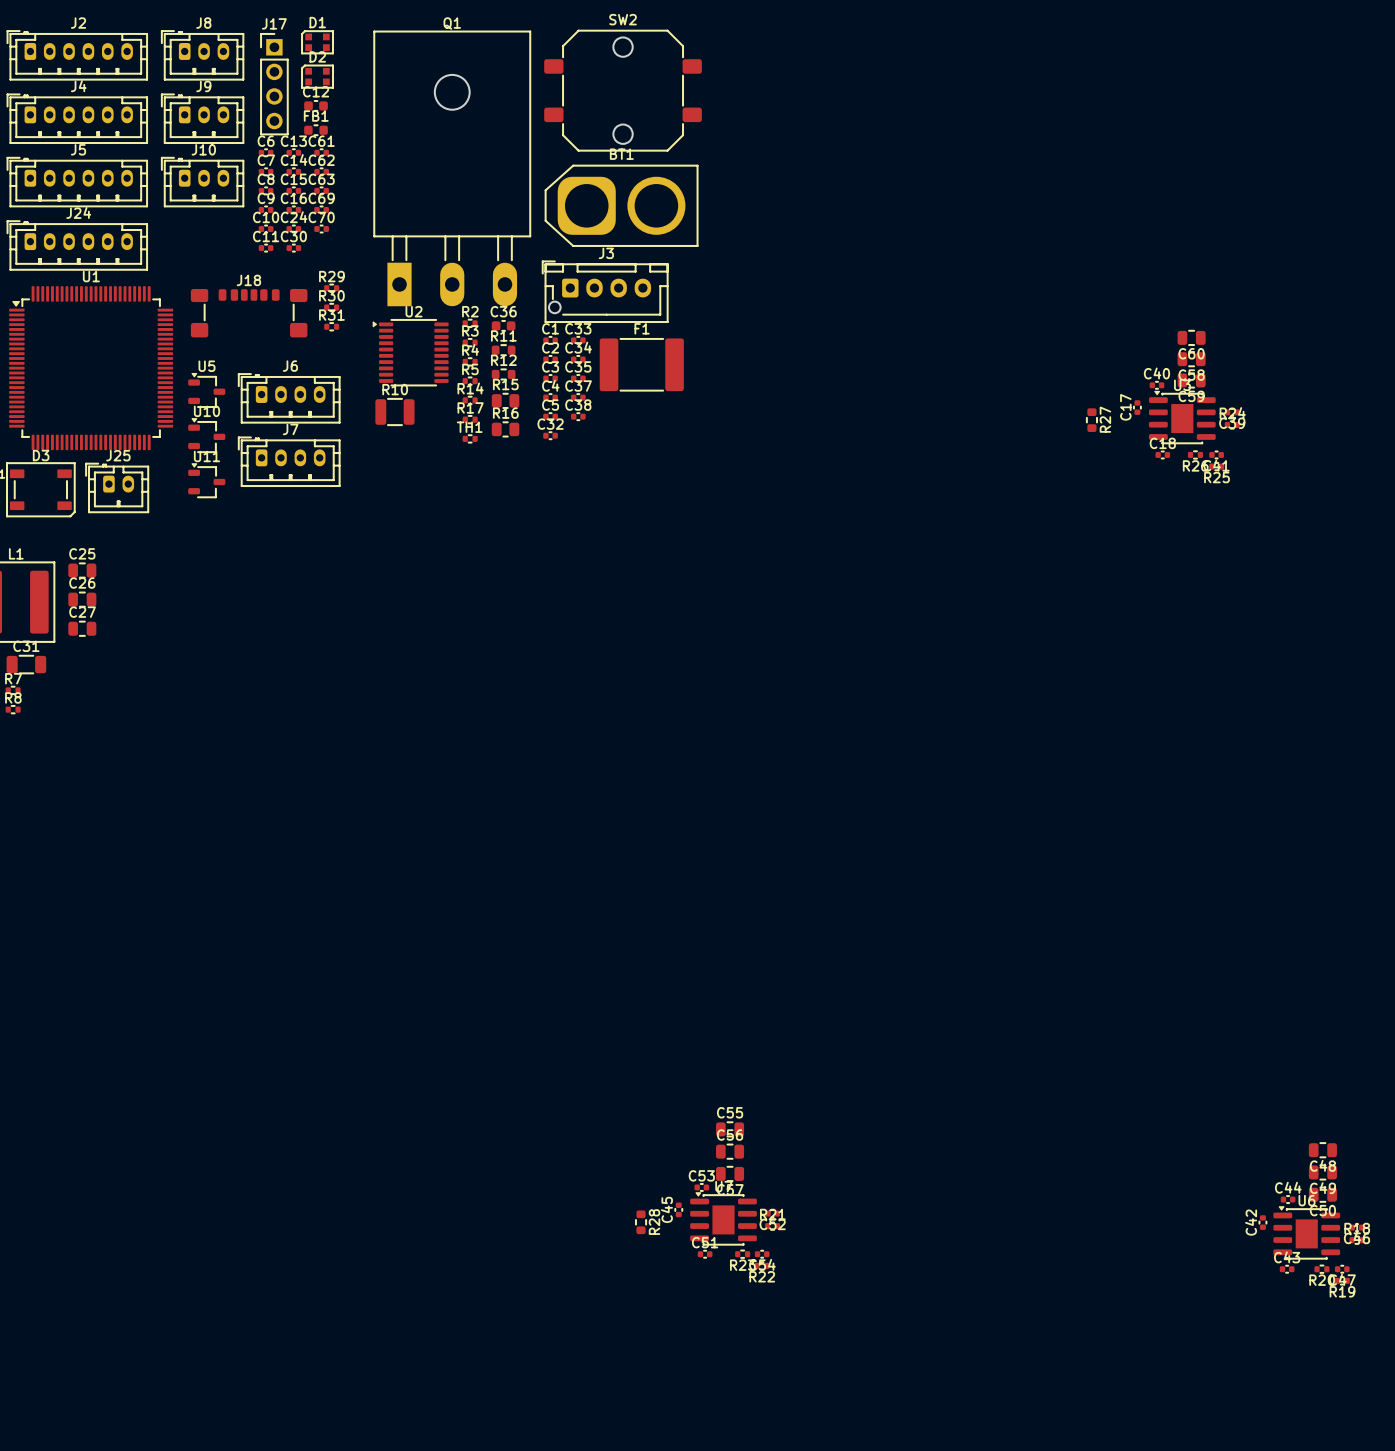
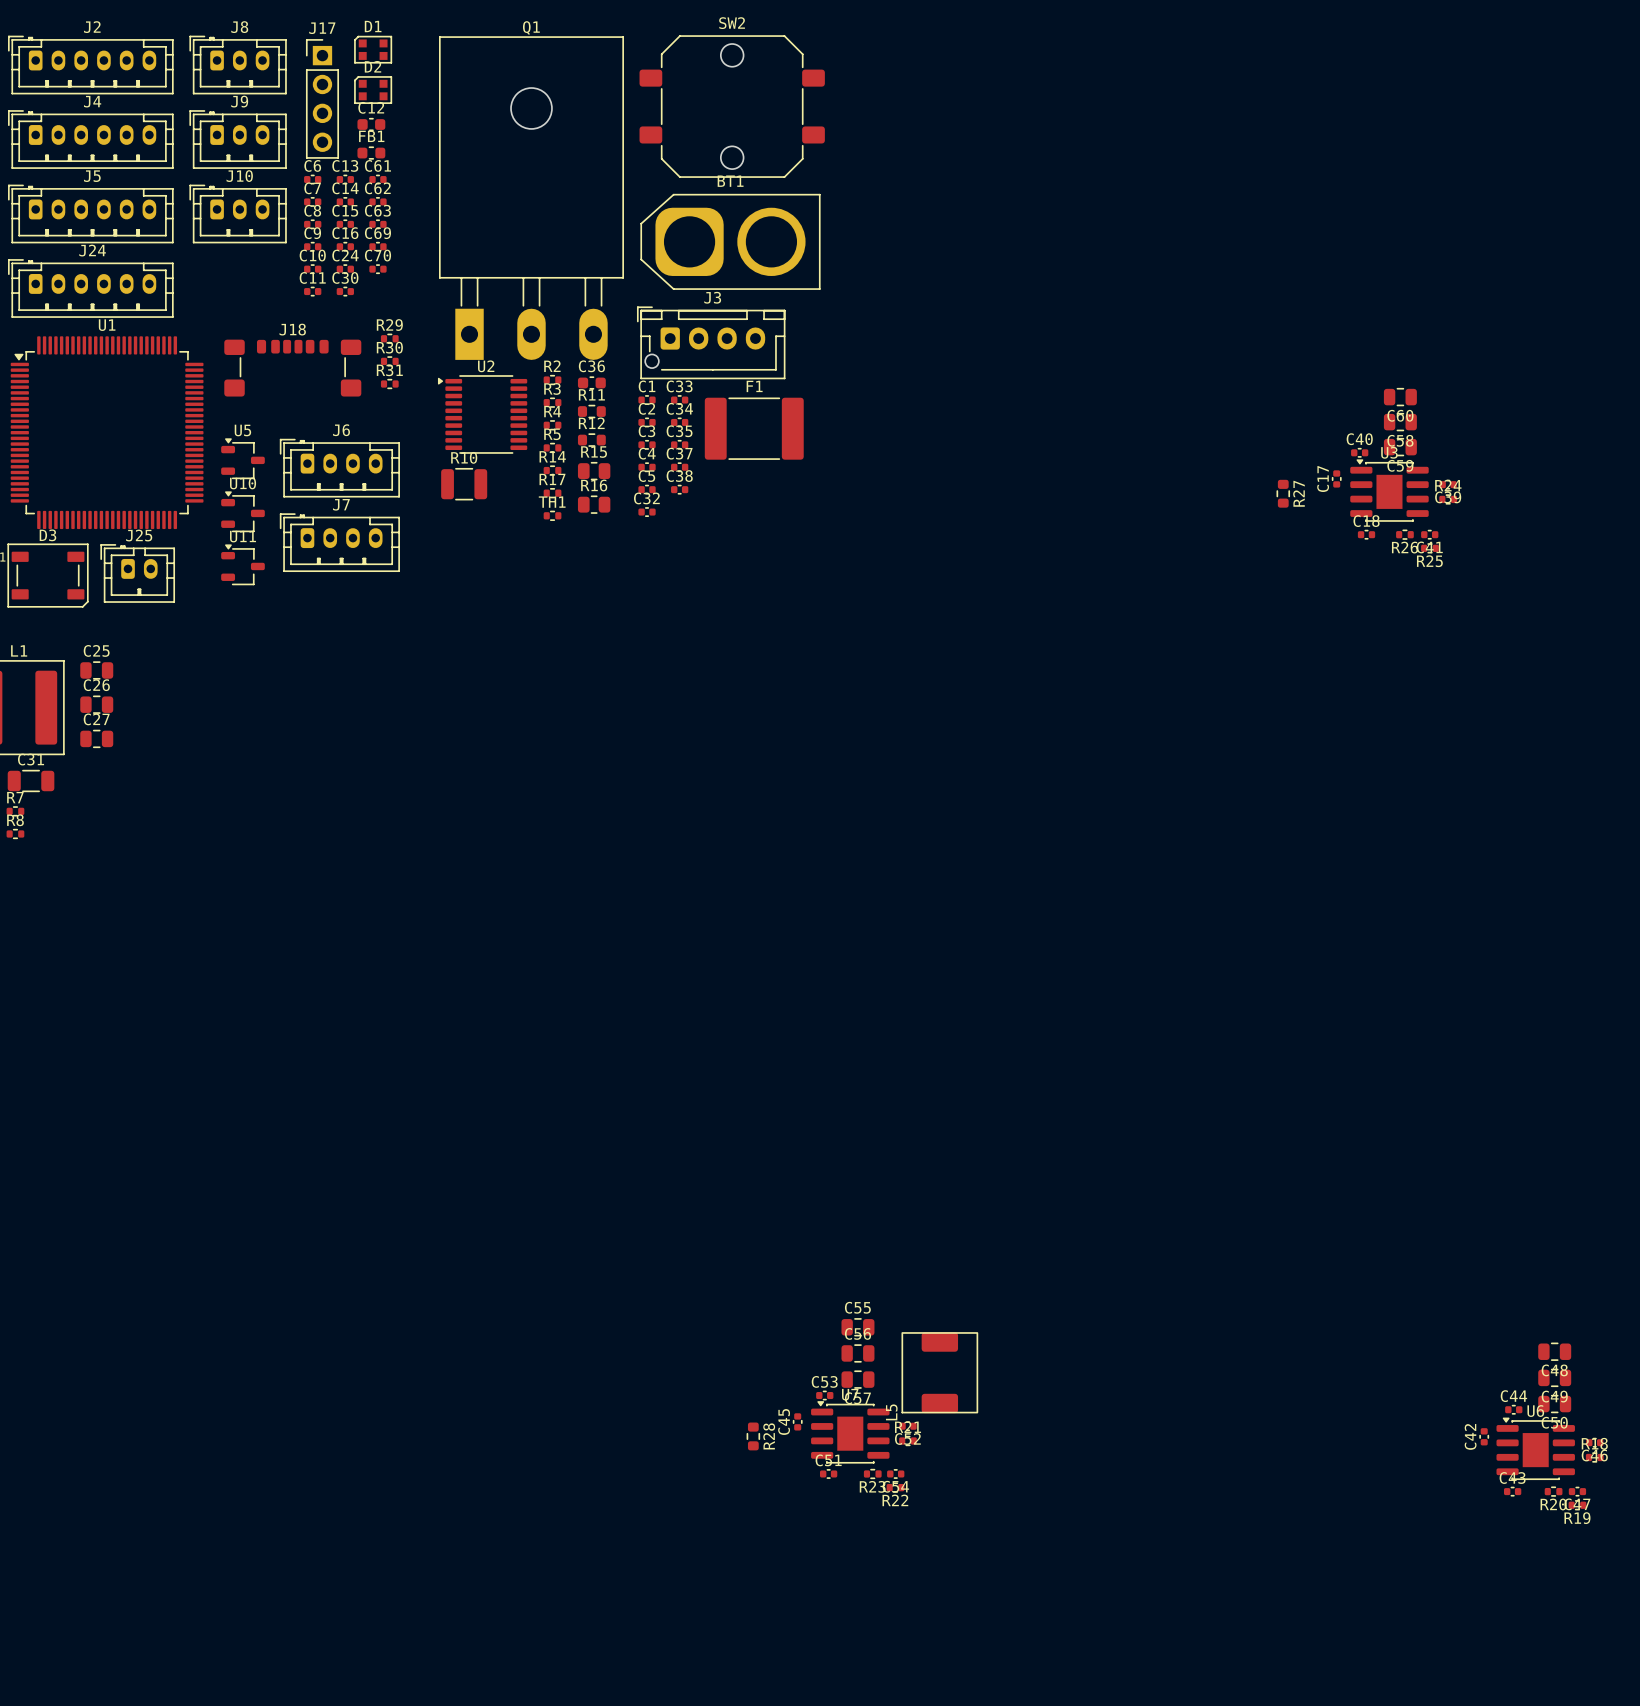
L5: none -> (939, 1372)

